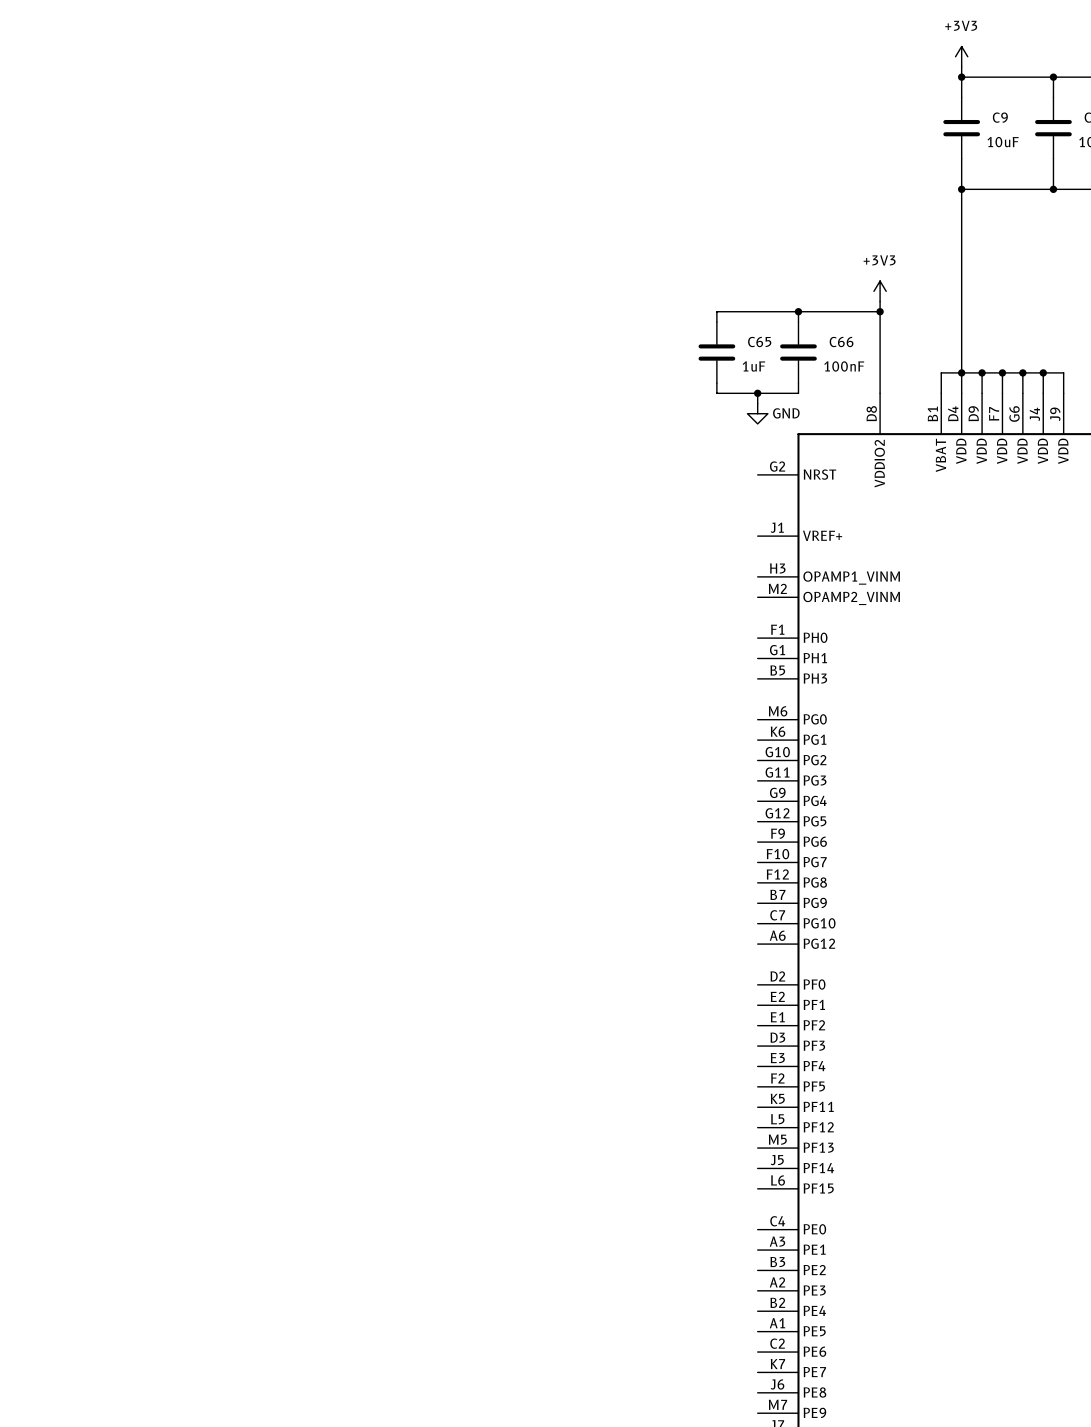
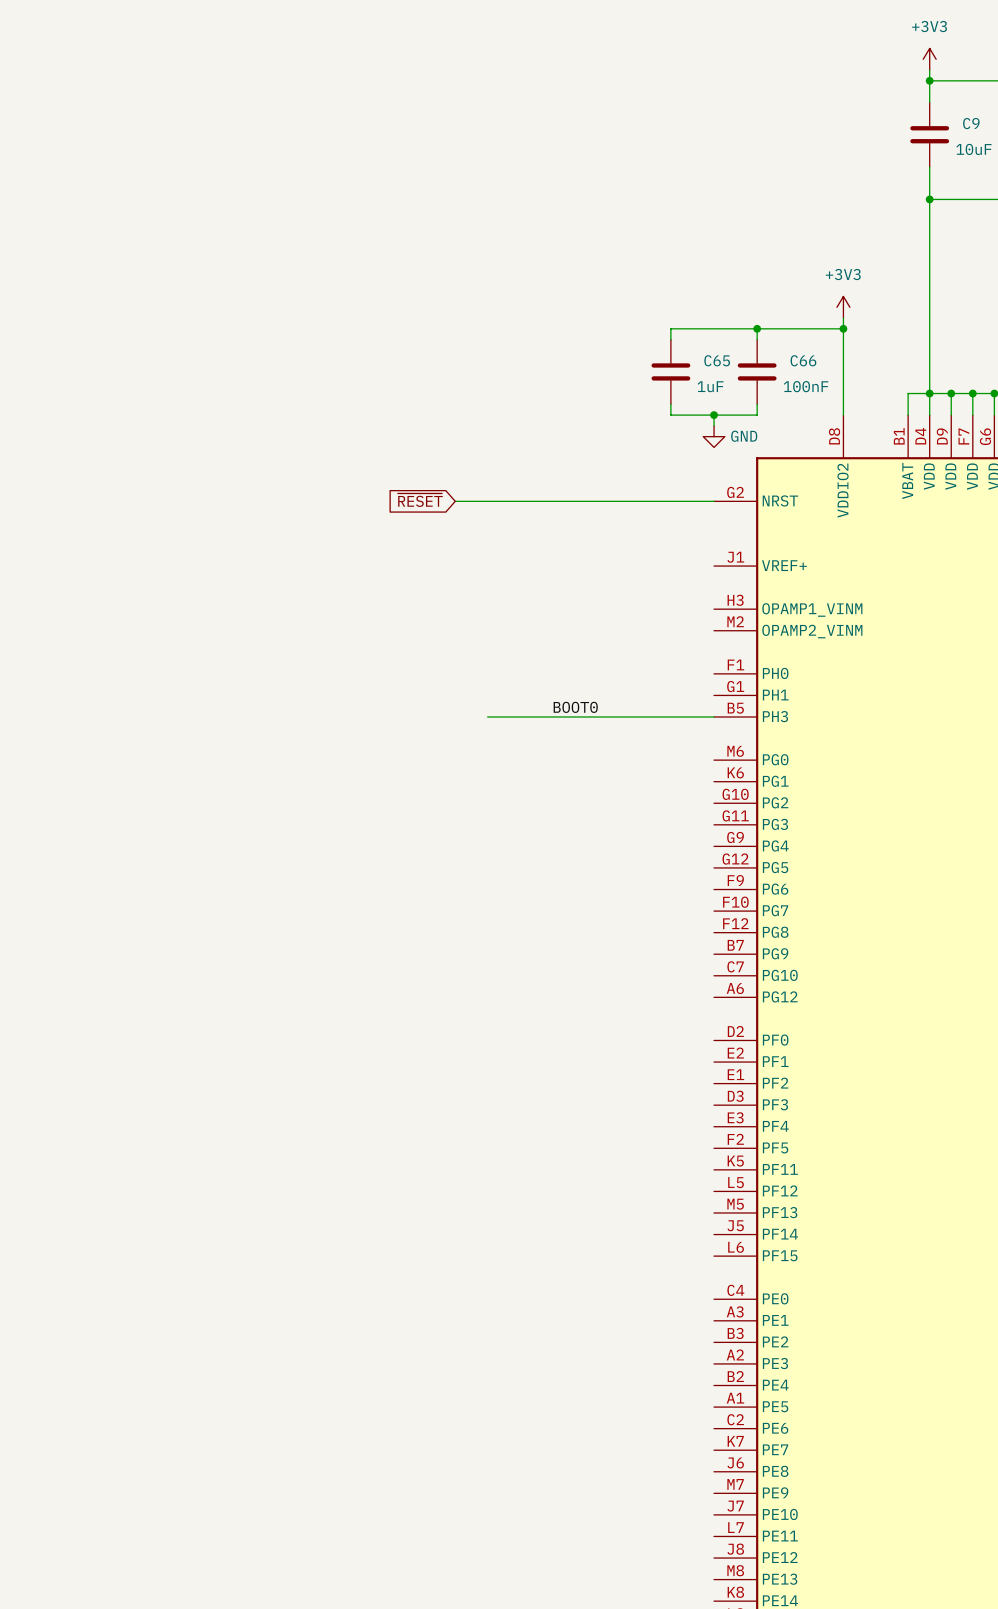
global label: none -> ~{RESET} (420, 500)
wire: none -> (455, 501) (714, 501)
label: none -> BOOT0 (575, 707)
wire: none -> (487, 716) (714, 716)

